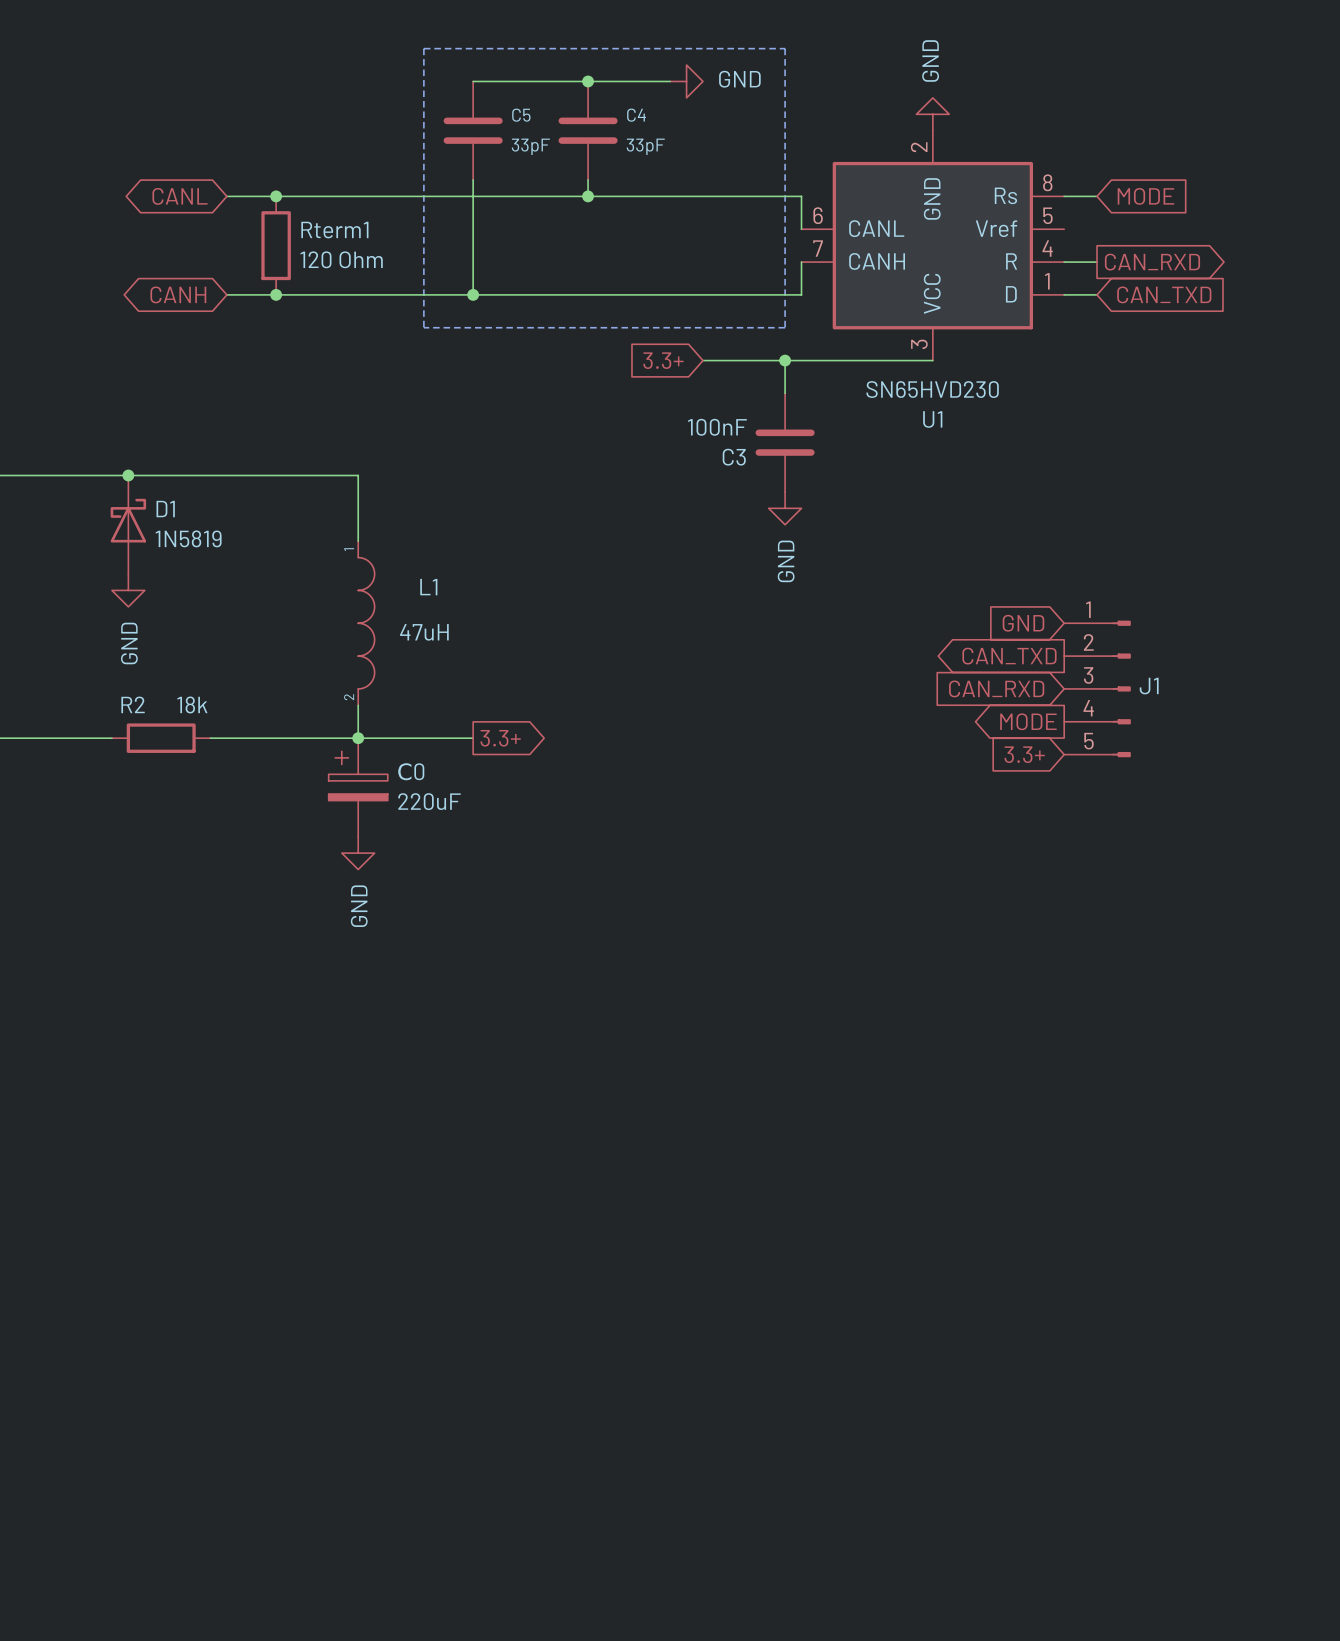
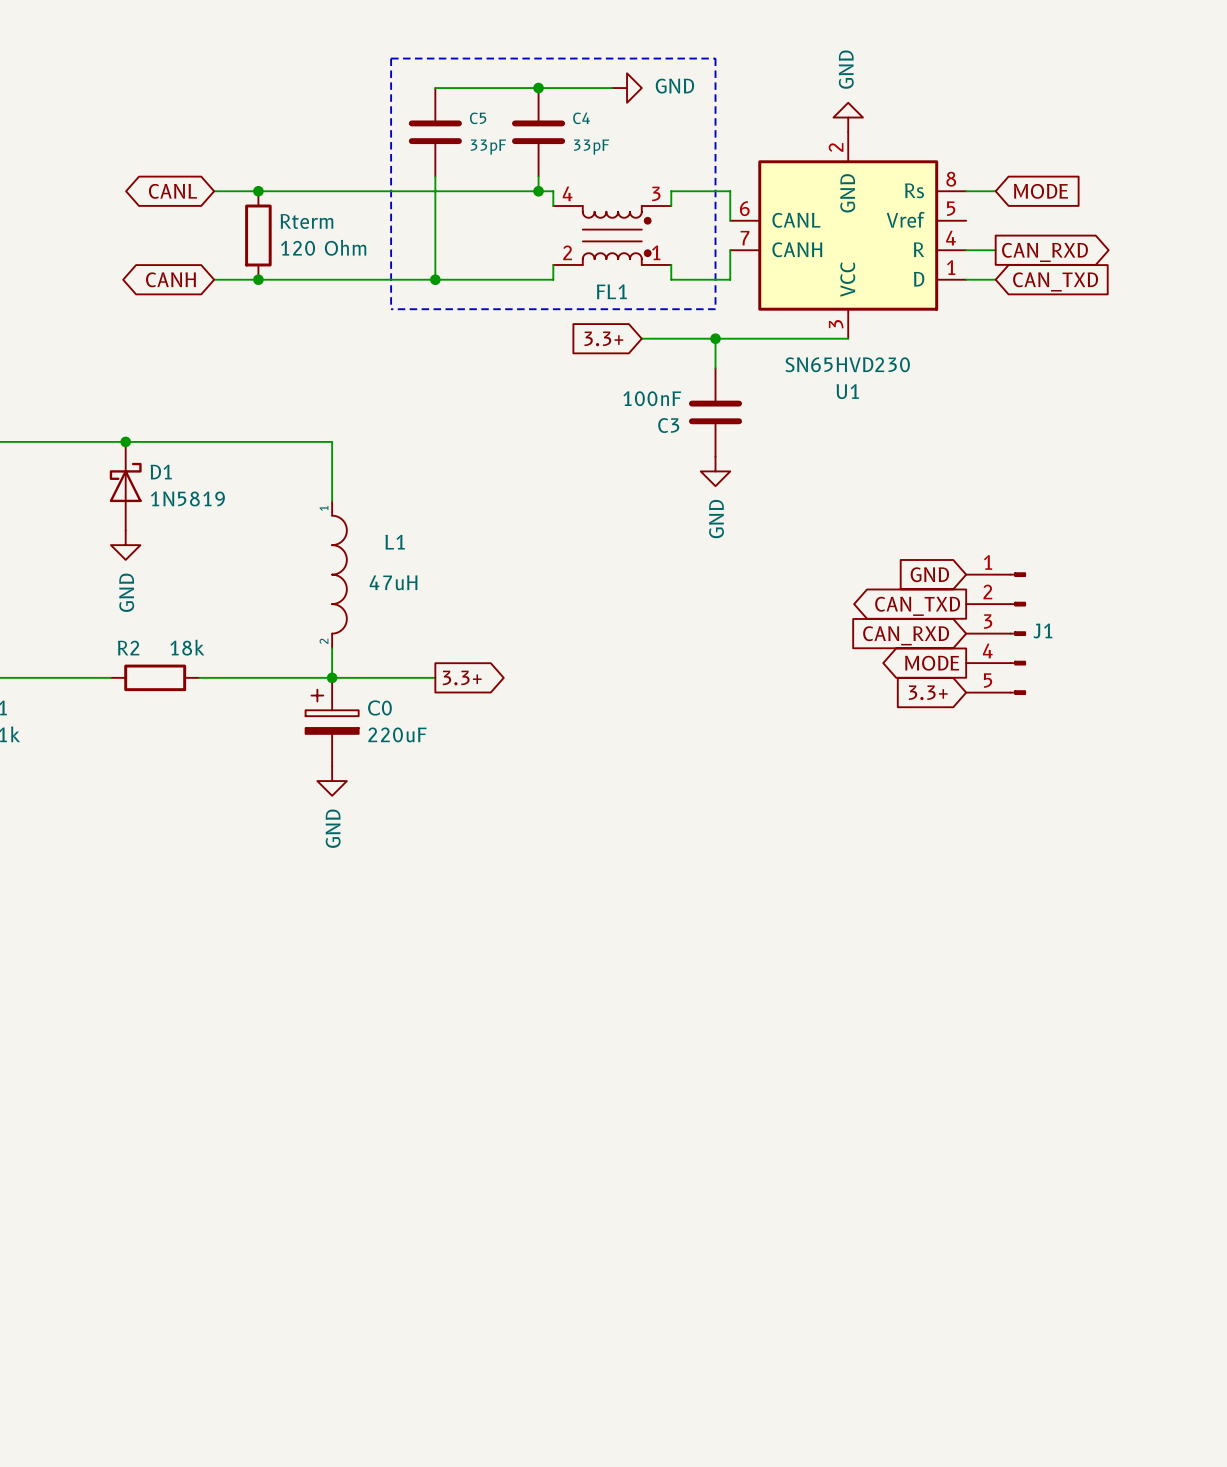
wire: (604, 196) (735, 196) -> (553, 191) (553, 206)
wire: none -> (671, 191) (671, 206)
Rterm1 name: Rterm1 (334, 230) -> Rterm (306, 221)
FL1: none -> (612, 235)
wire: none -> (671, 264) (671, 279)
wire: (604, 294) (735, 294) -> (553, 279) (553, 264)

